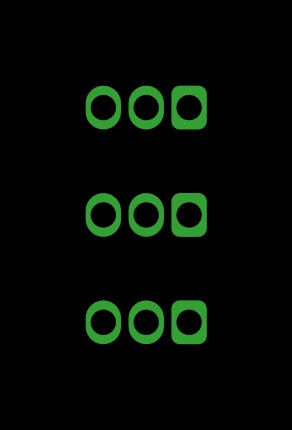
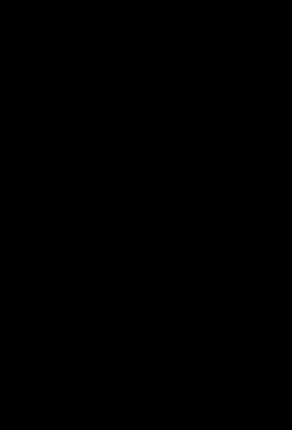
part: (146, 107) -> none
part: (146, 214) -> none
part: (146, 322) -> none

